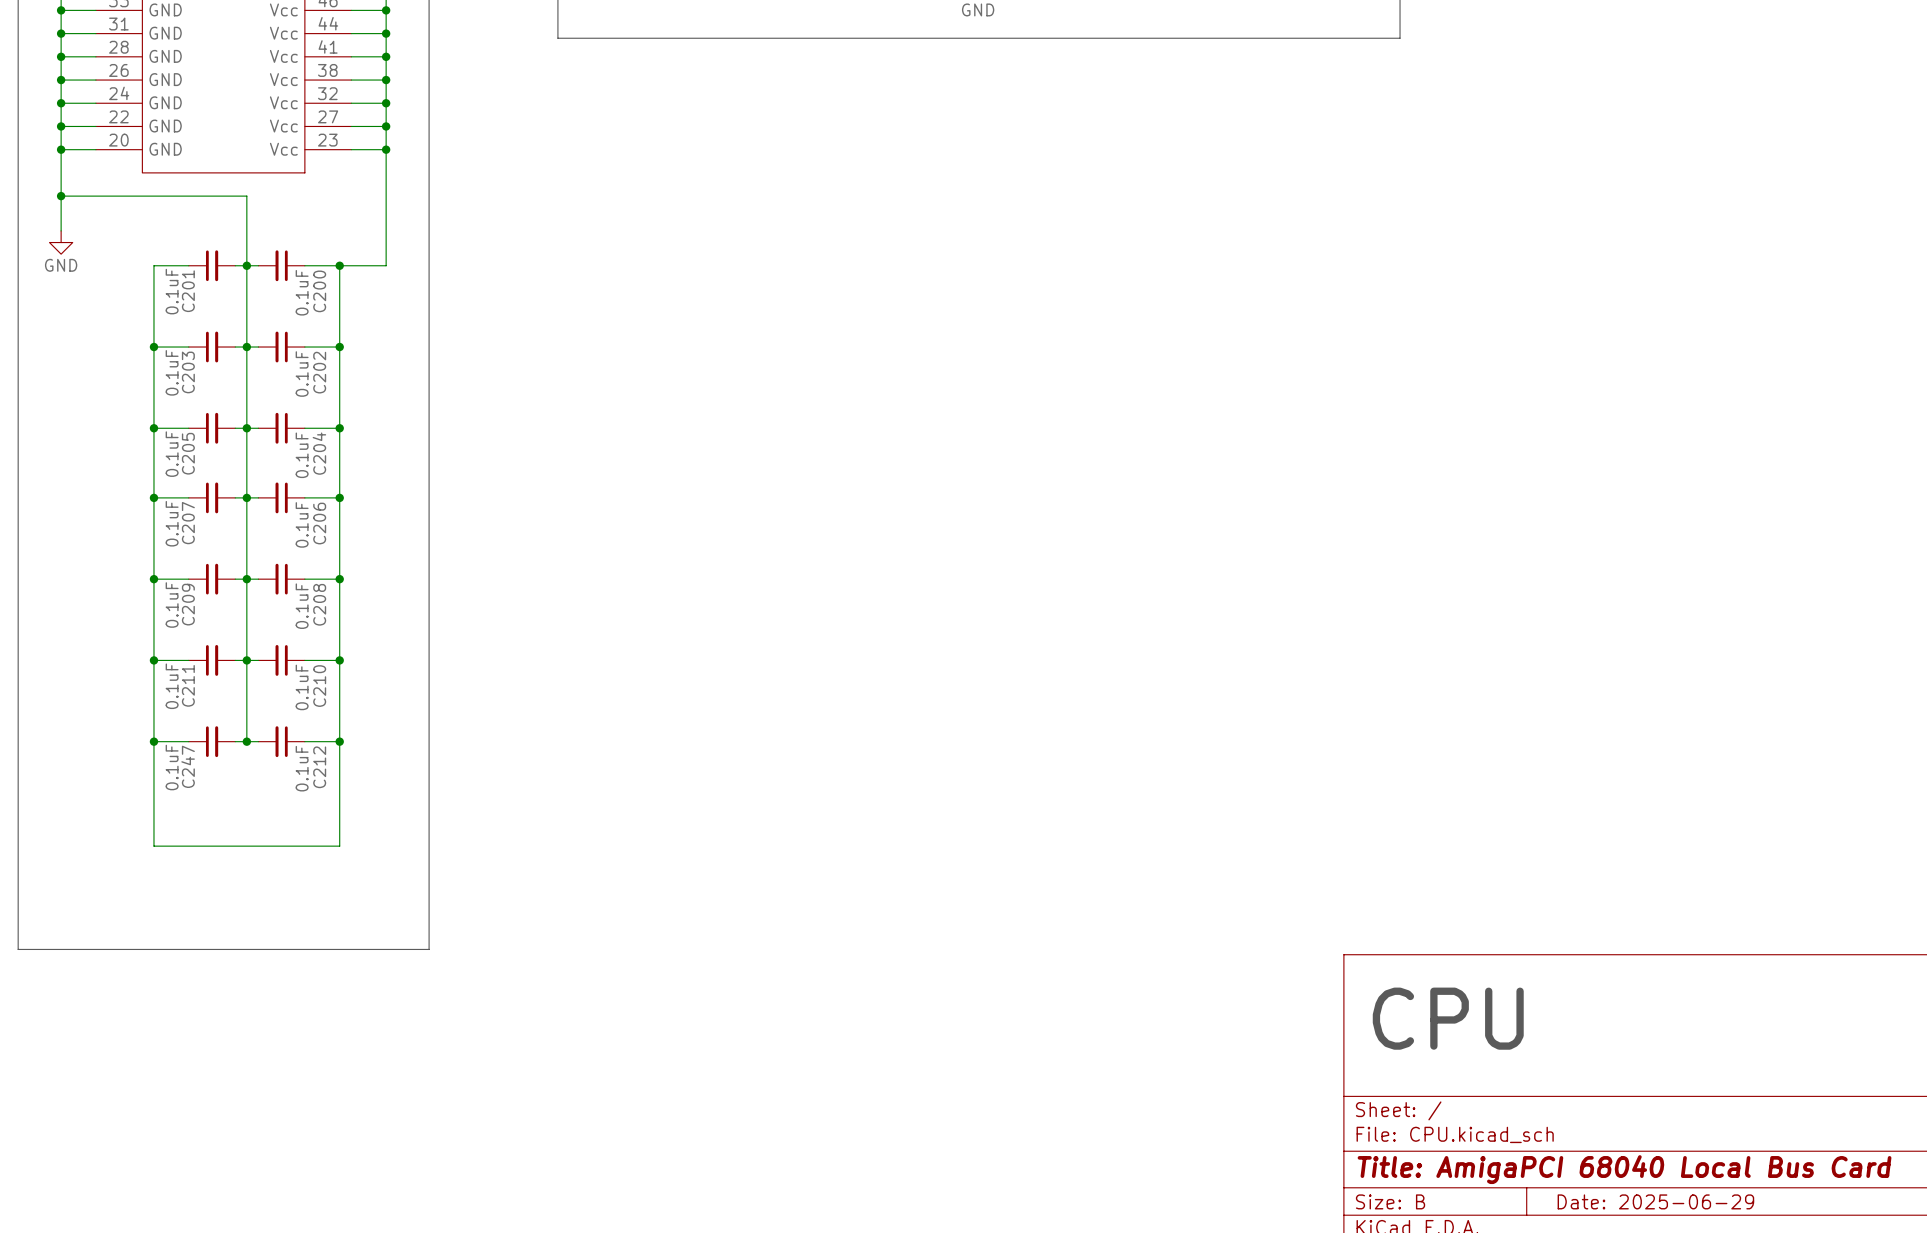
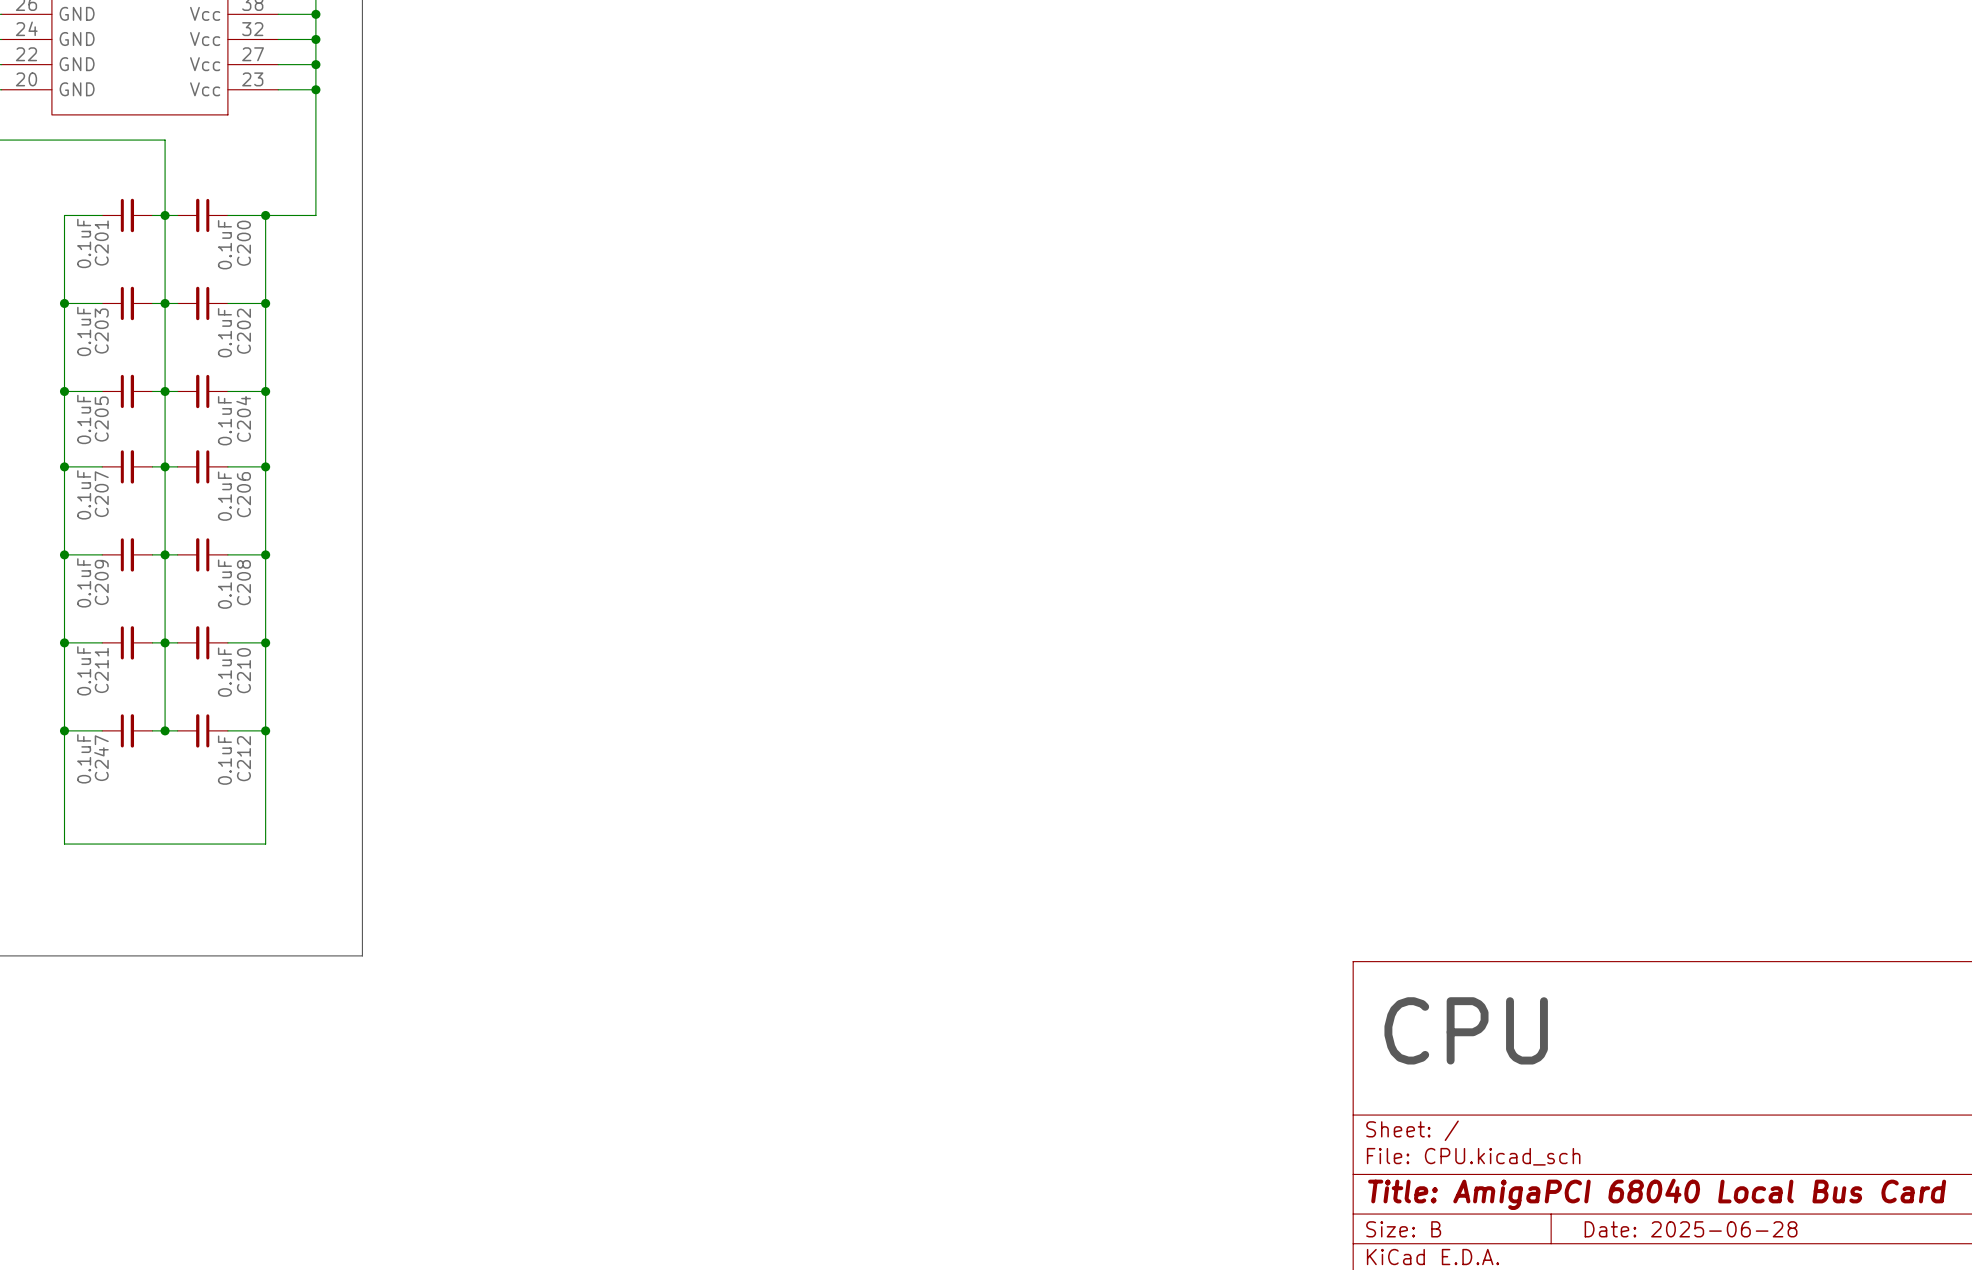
title block: Date: 2025-06-29 (1655, 1201) -> Date: 2025-06-28 (1691, 1229)

